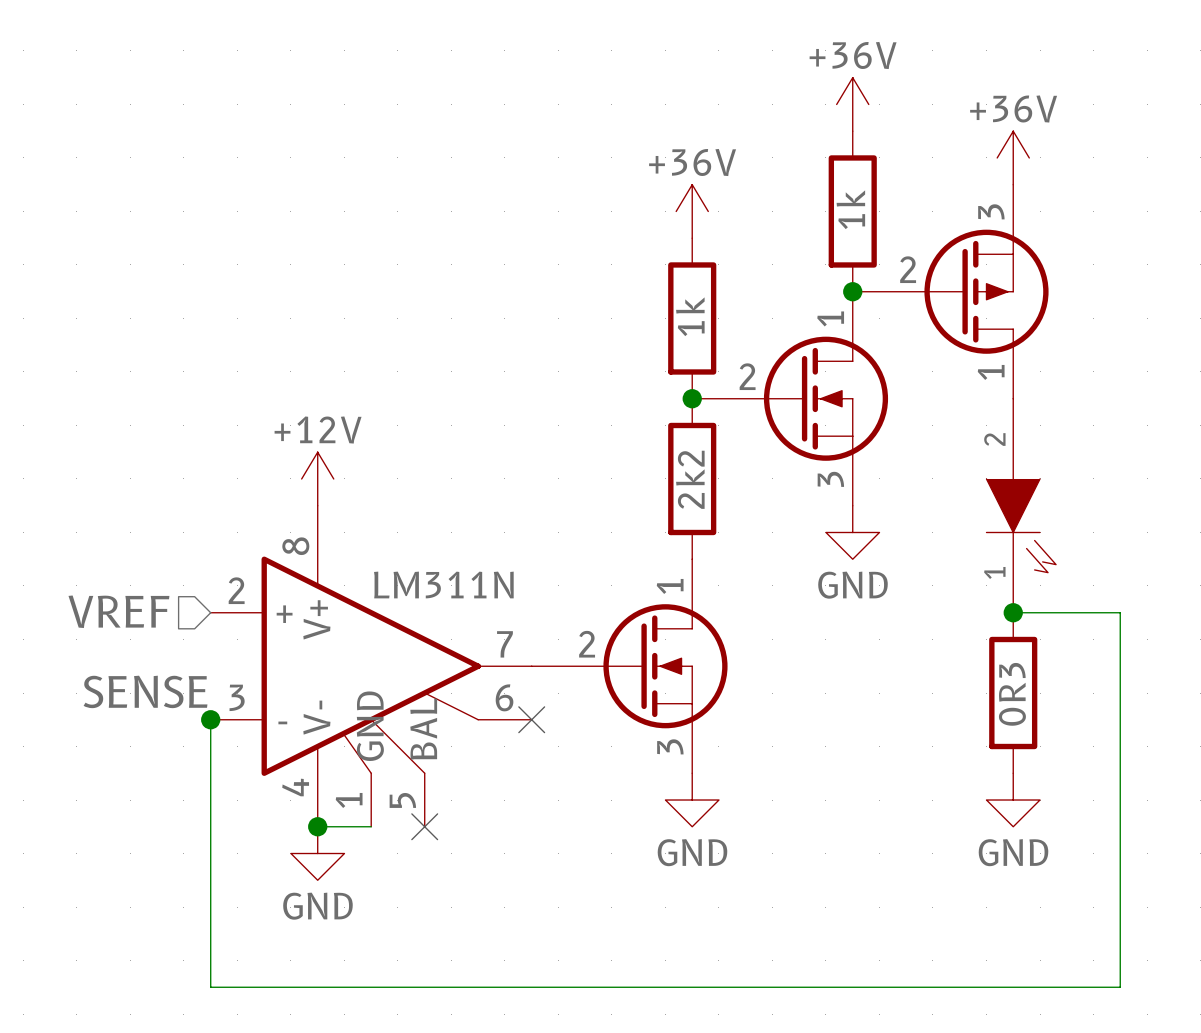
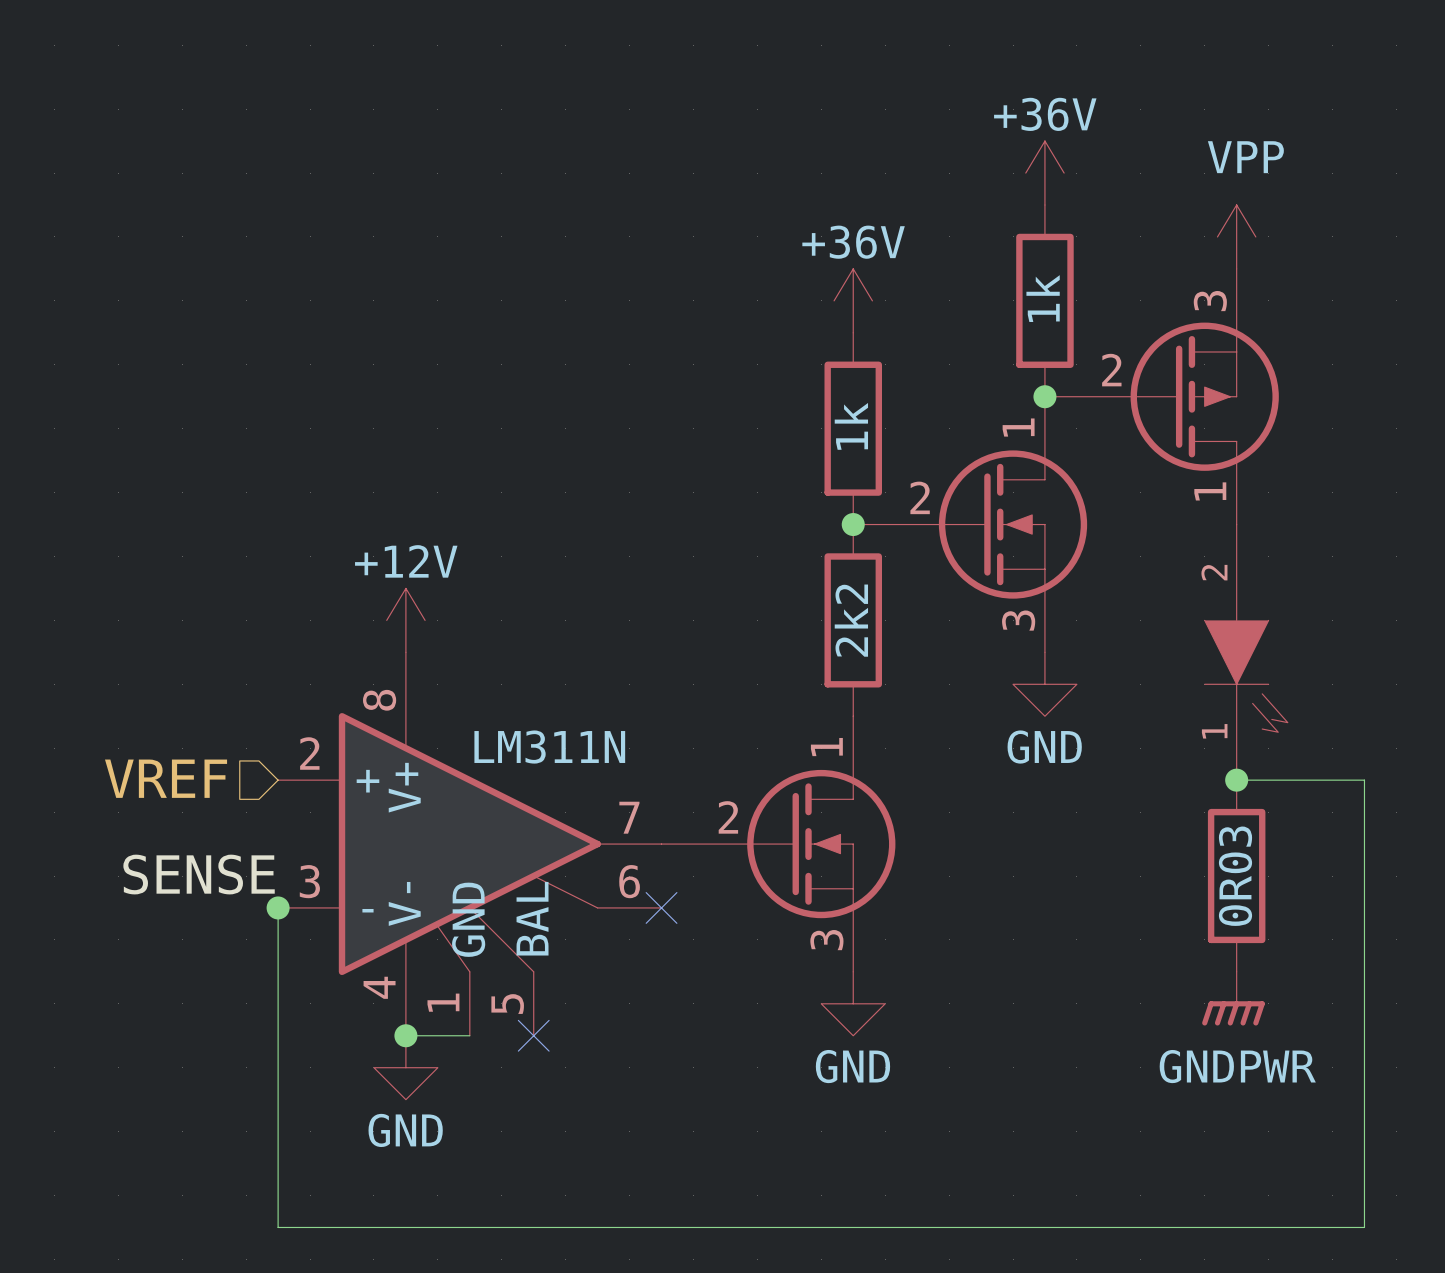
power symbol: +36V (1013, 157) -> VPP (1236, 236)
part value: 0R3 (1012, 694) -> 0R03 (1235, 876)
power symbol: GND (1013, 800) -> GNDPWR (1233, 998)

